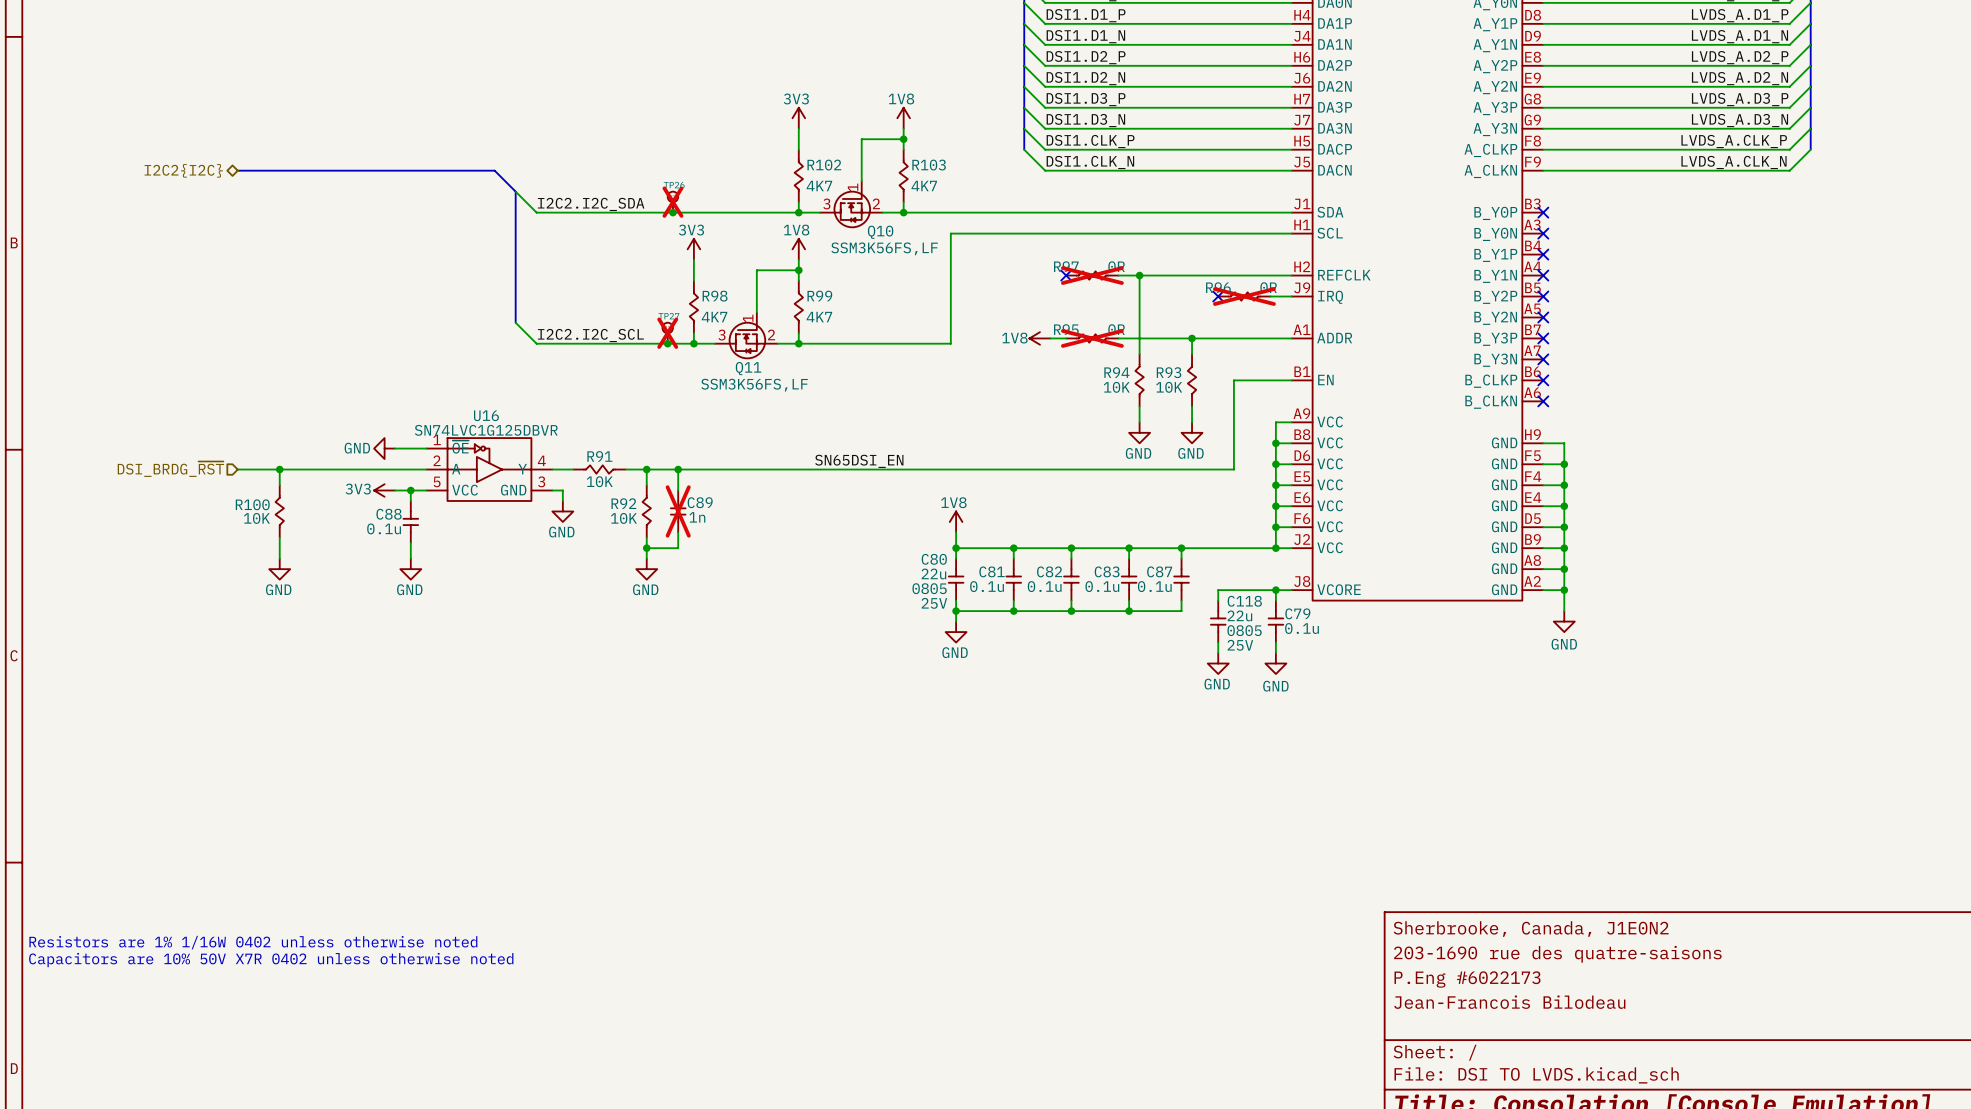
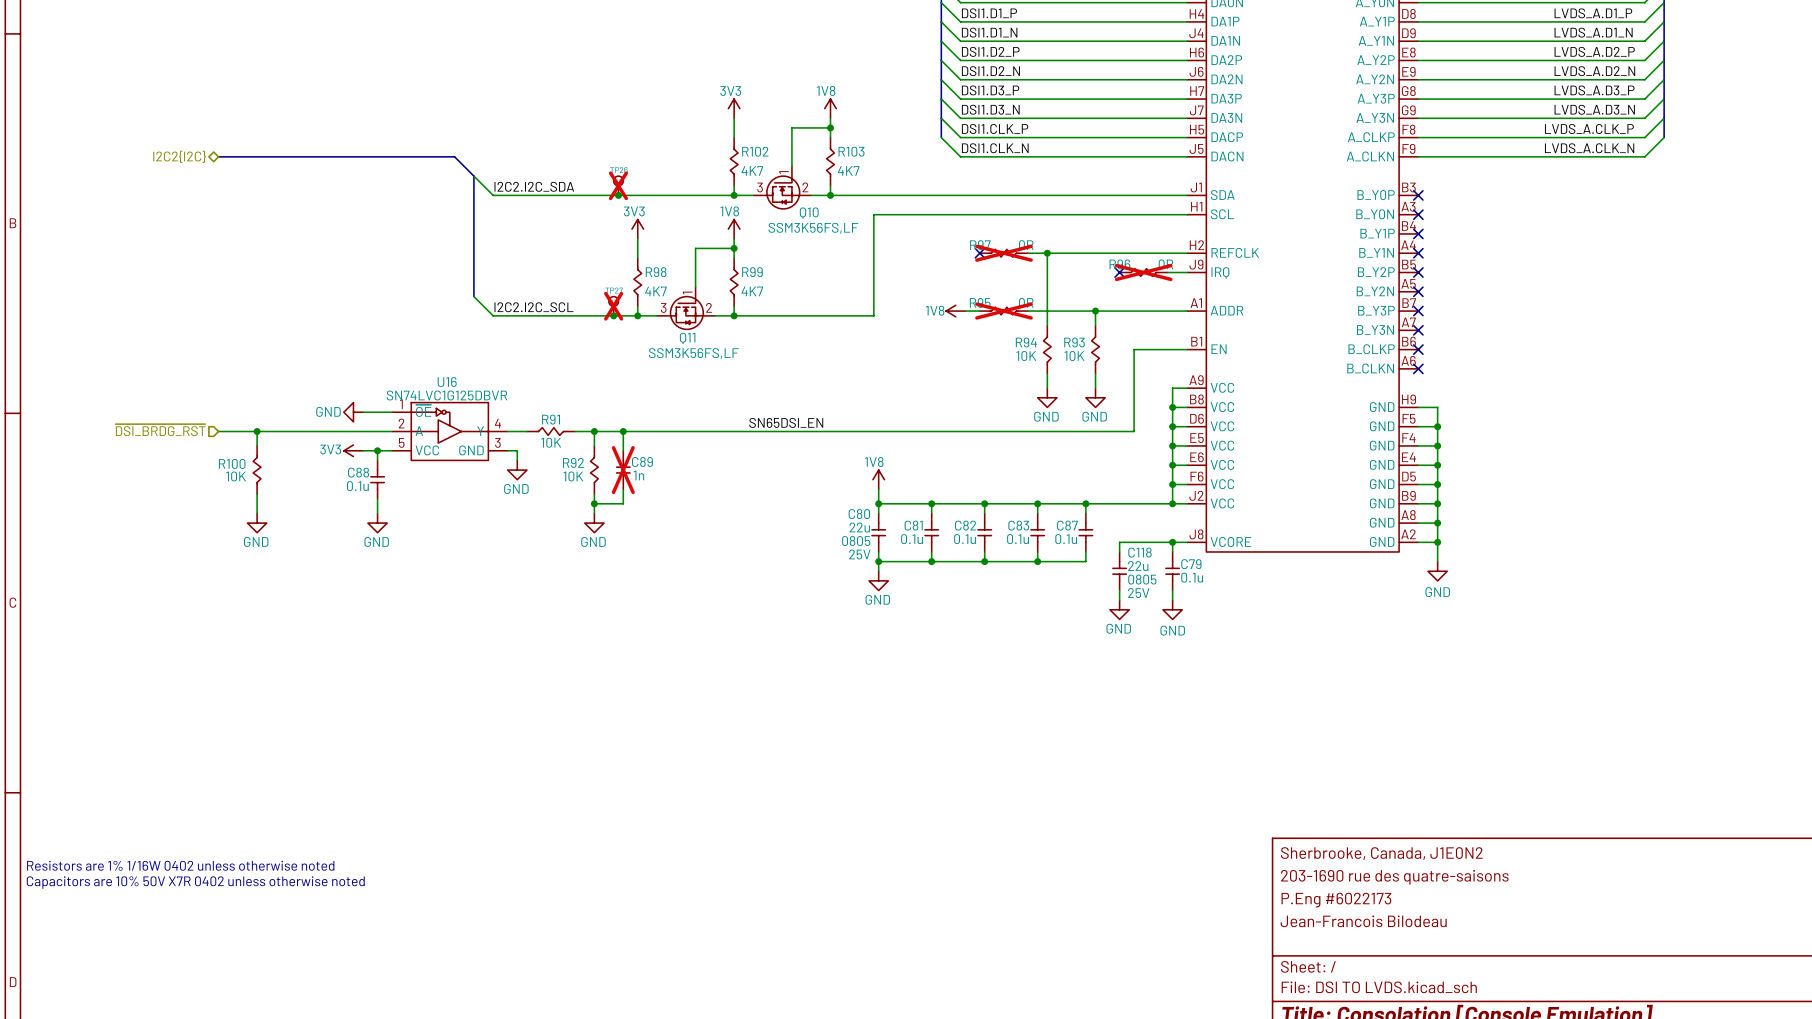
hierarchical label: DSI_BRDG_~{RST} (170, 469) -> ~{DSI_BRDG_RST} (160, 430)

